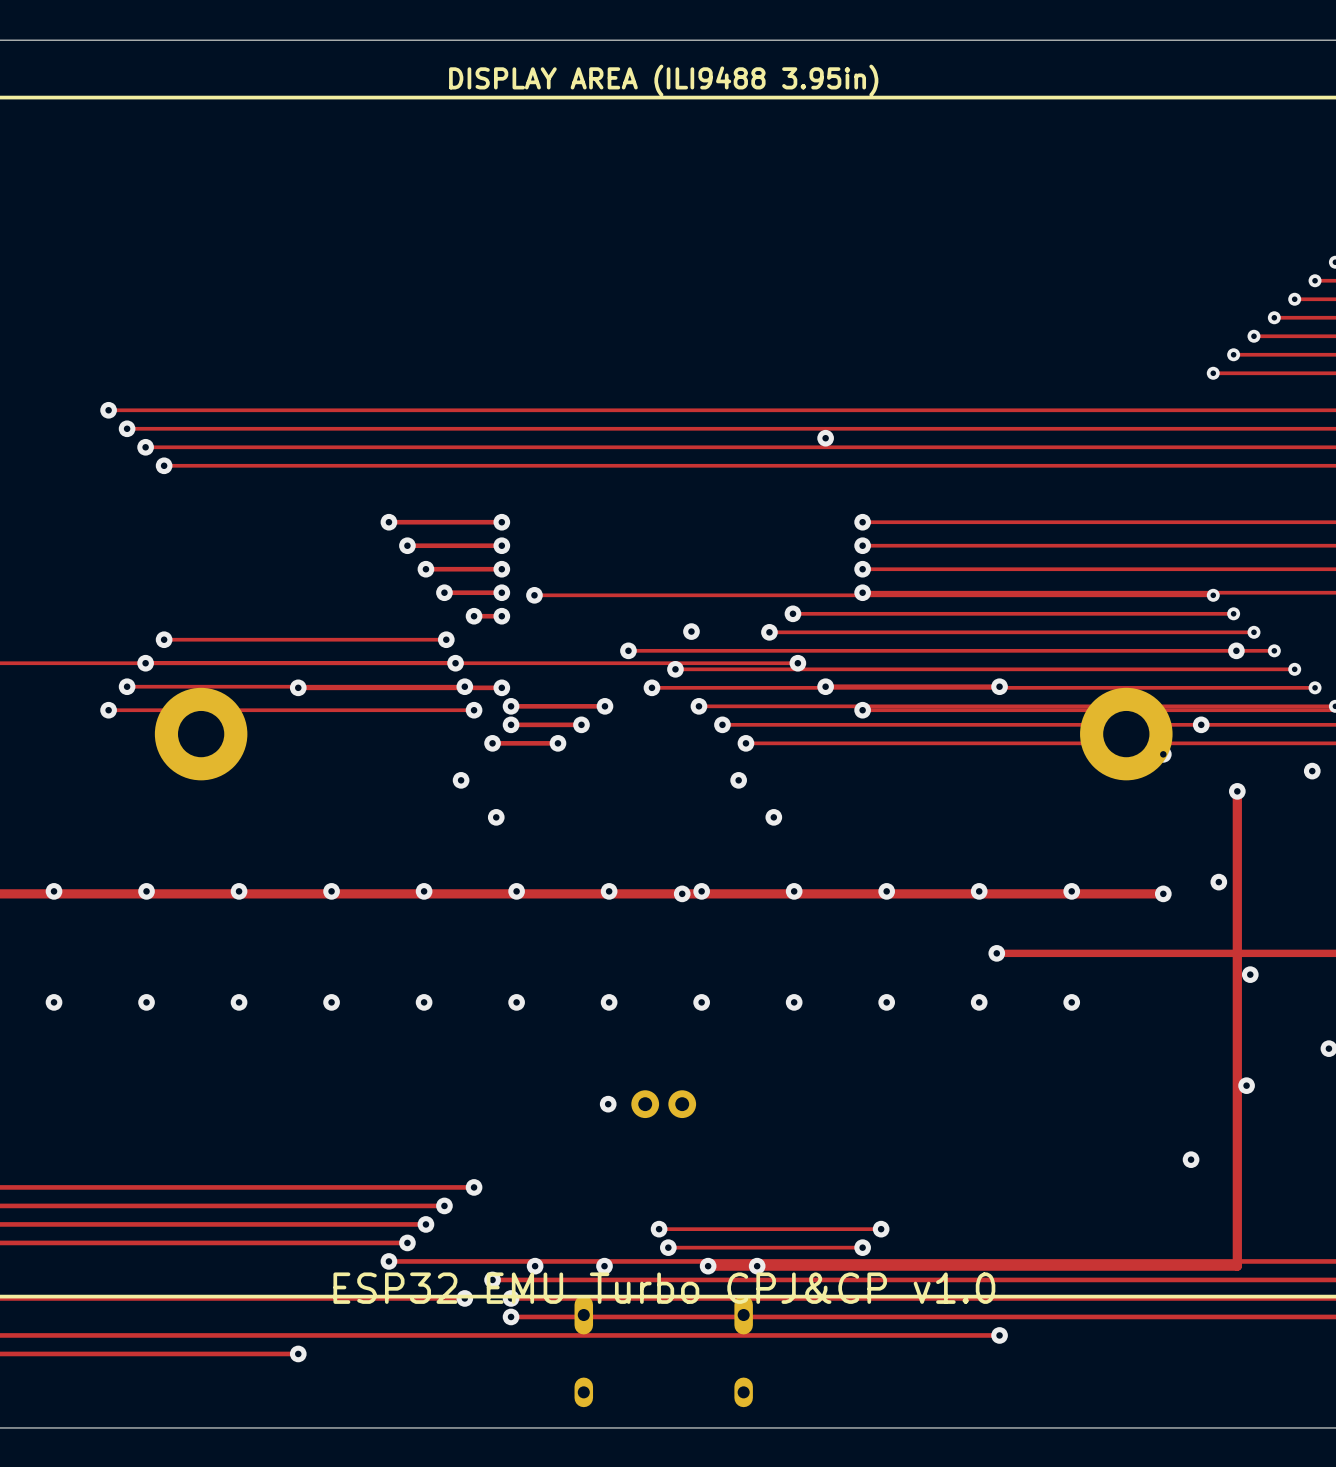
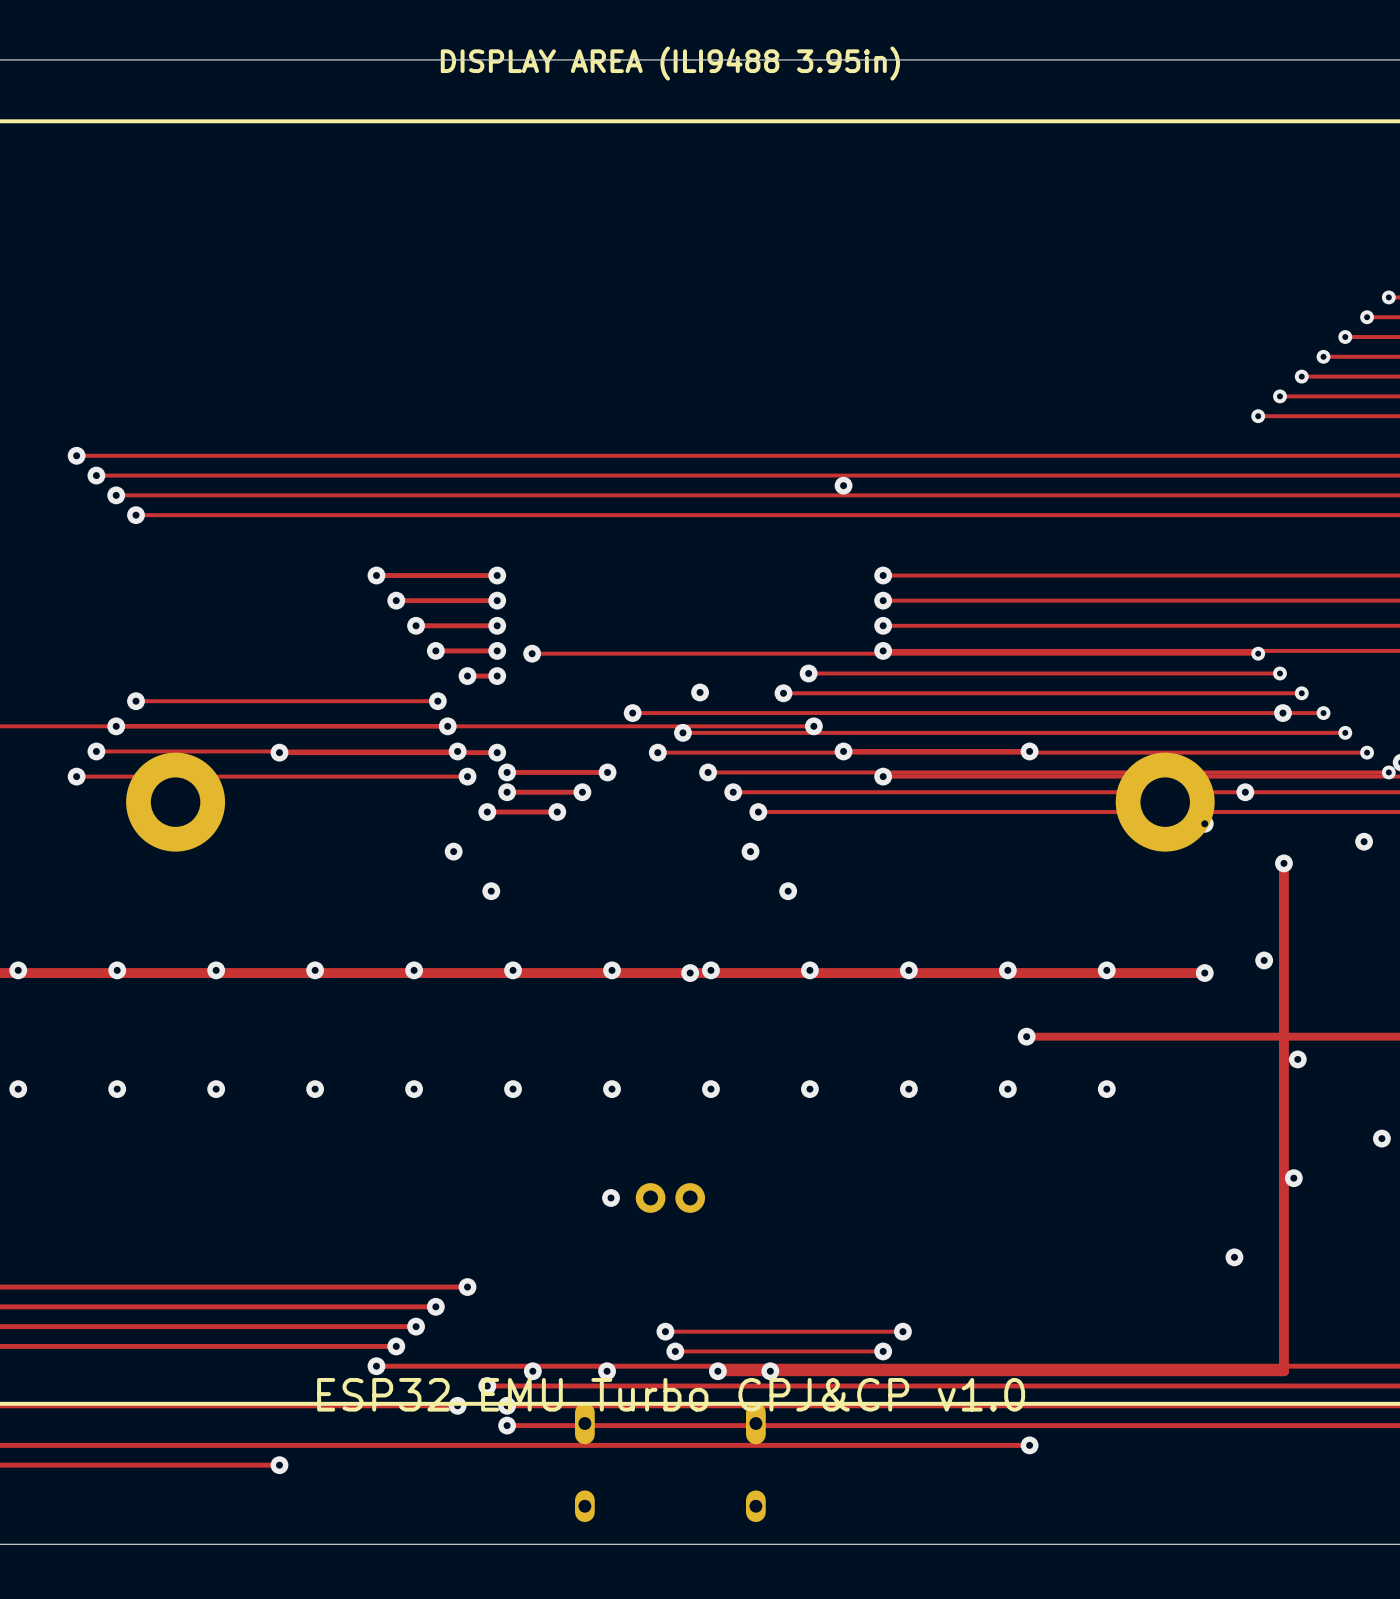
text position: DISPLAY AREA (ILI9488 3.95in) (663, 80) -> DISPLAY AREA (ILI9488 3.95in) (670, 63)

